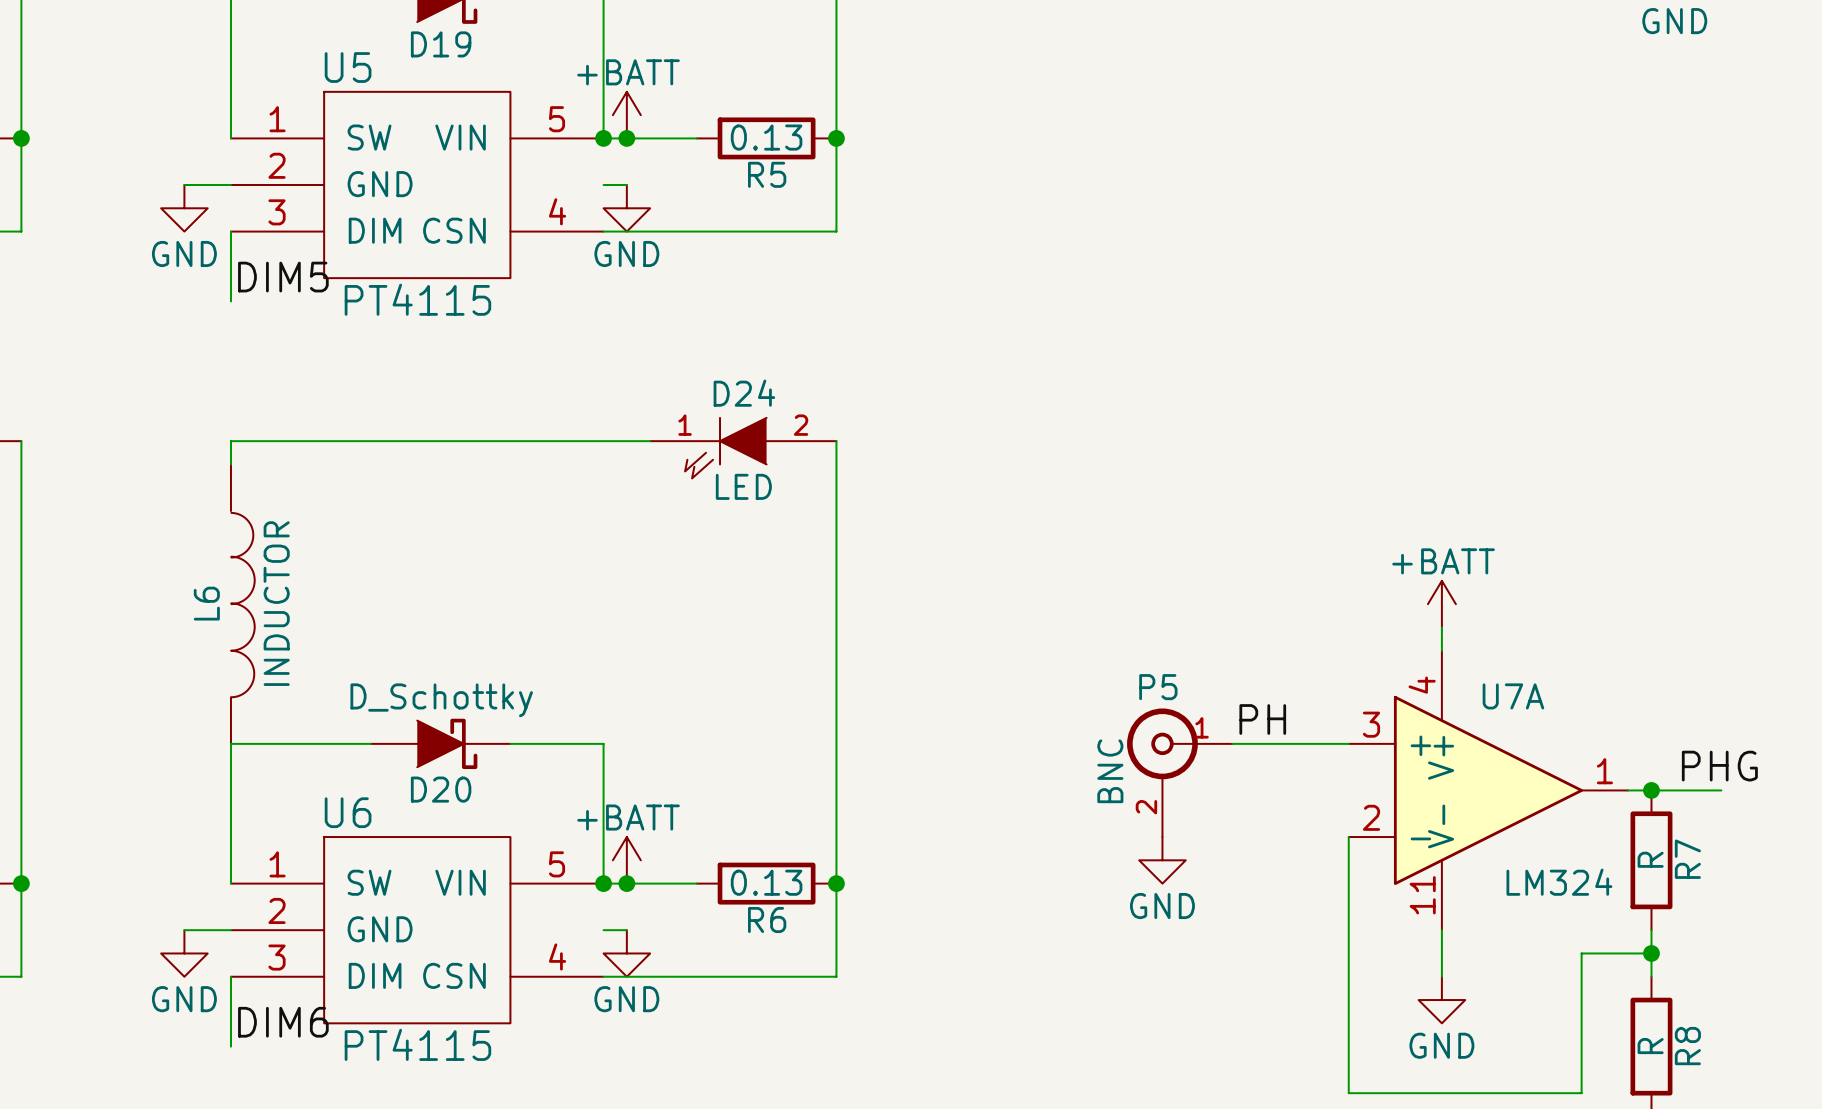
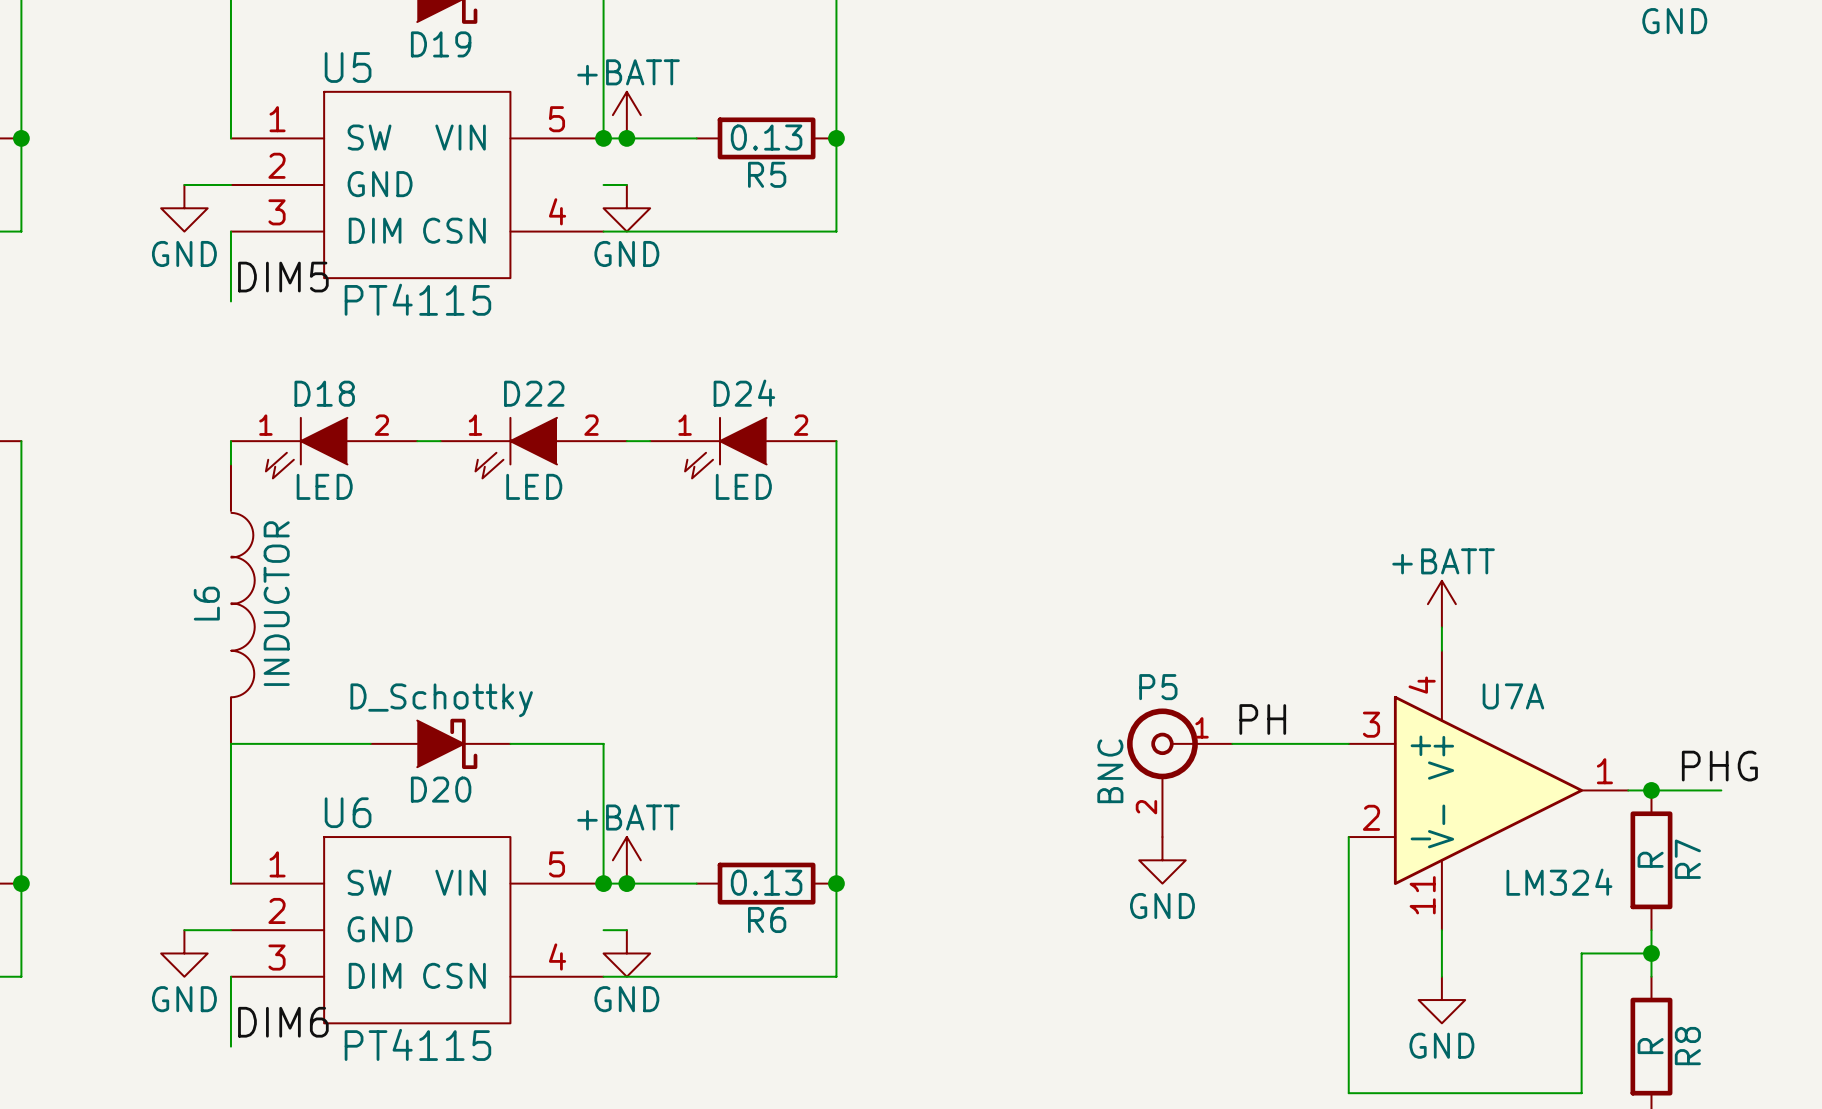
D18: none -> LED (324, 448)
D22: none -> LED (533, 448)

